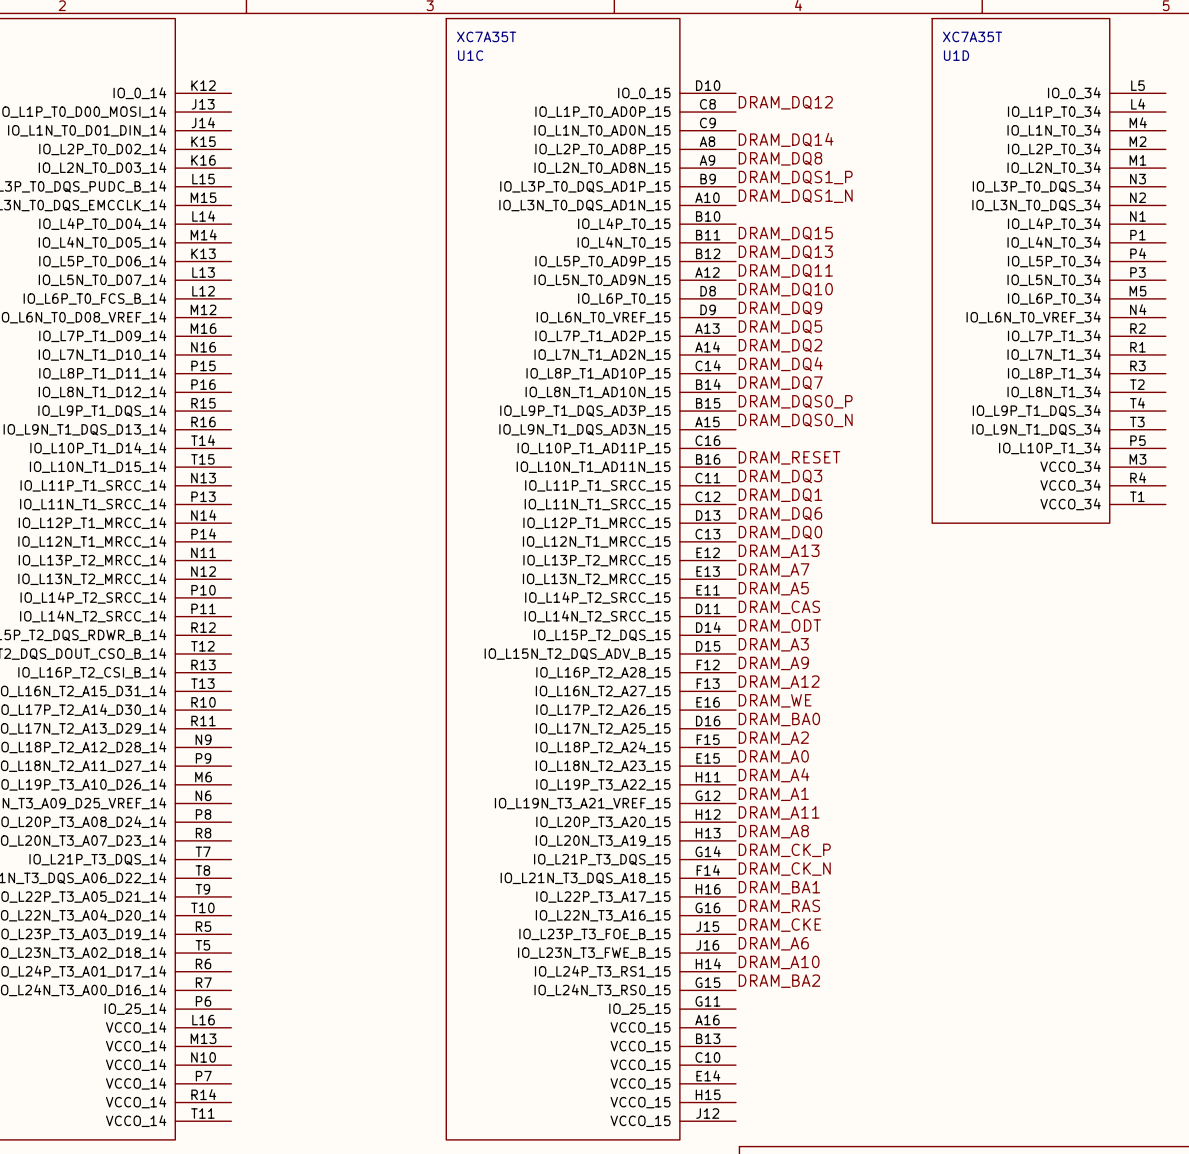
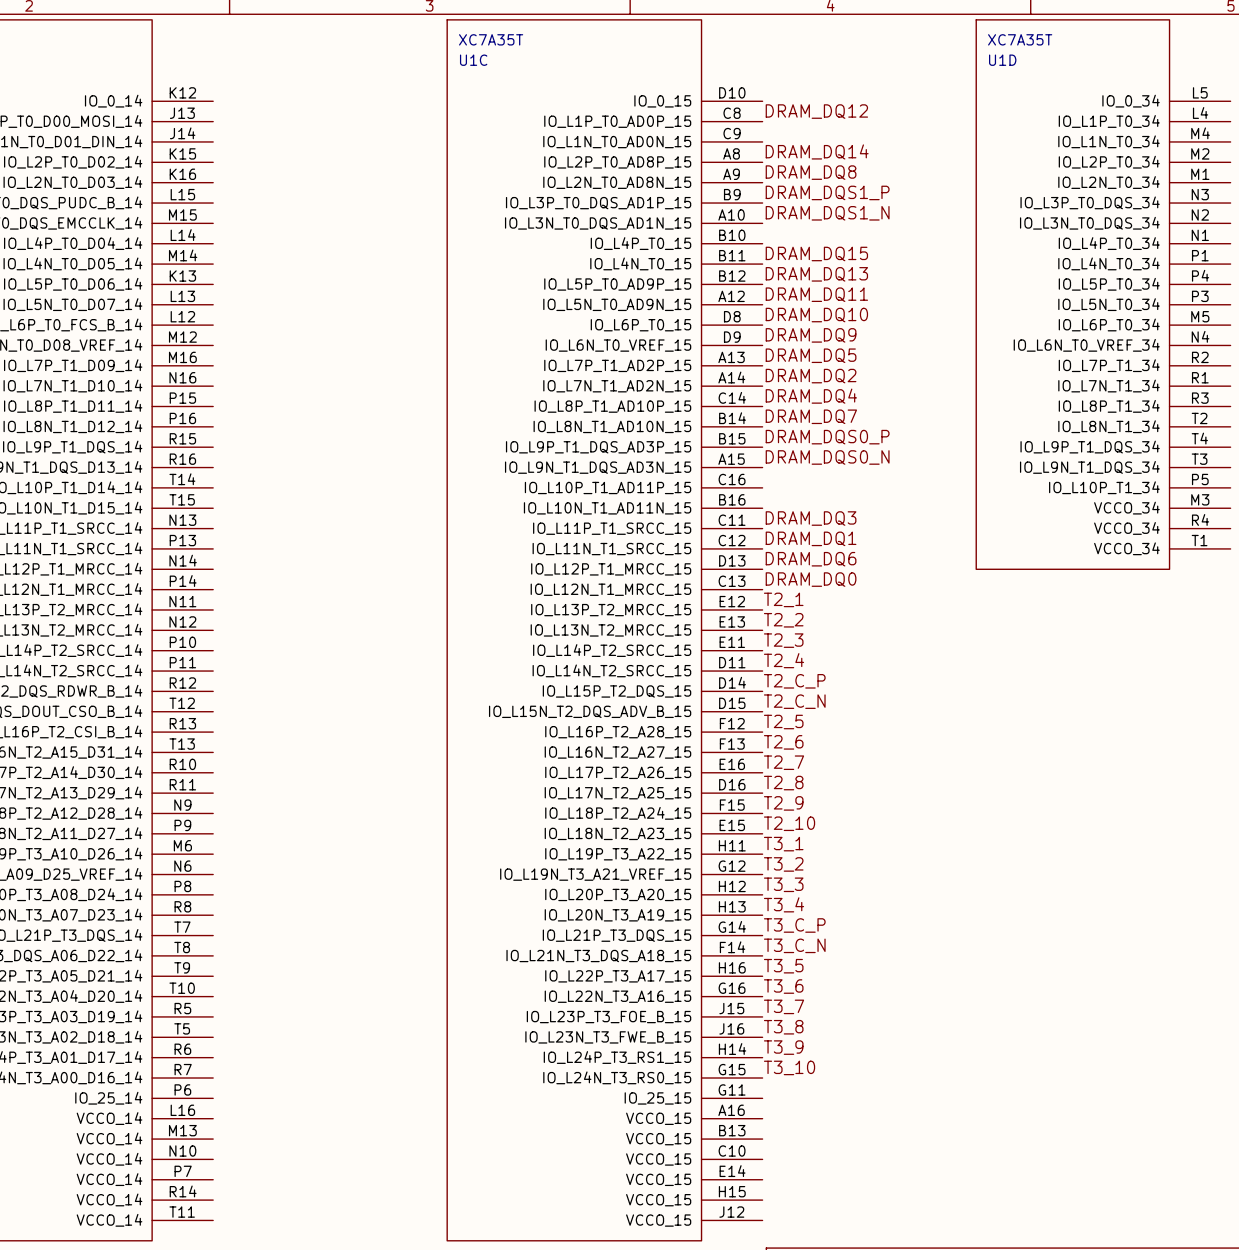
label: DRAM_RESET (789, 457) -> none
label: DRAM_A13 (779, 551) -> T2_1 (783, 599)
label: DRAM_A7 (774, 569) -> T2_2 (783, 620)
label: DRAM_A5 (773, 588) -> T2_3 (783, 640)
label: DRAM_CAS (779, 607) -> T2_4 (784, 660)
label: DRAM_ODT (779, 626) -> T2_C_P (794, 681)
label: DRAM_A3 (773, 644) -> T2_C_N (794, 701)
label: DRAM_A9 (773, 663) -> T2_5 (783, 722)
label: DRAM_A12 (779, 682) -> T2_6 (783, 742)
label: DRAM_WE (775, 700) -> T2_7 (784, 762)
label: DRAM_BA0 (779, 719) -> T2_8 (783, 783)
label: DRAM_A2 (773, 738) -> T2_9 (783, 803)
label: DRAM_A0 (773, 756) -> T2_10 (789, 823)
label: DRAM_A4 (774, 775) -> T3_1 (783, 844)
label: DRAM_A1 (773, 794) -> T3_2 (783, 864)
label: DRAM_A11 (779, 812) -> T3_3 (783, 884)
label: DRAM_A8 (773, 831) -> T3_4 (784, 904)
label: DRAM_CK_P (784, 850) -> T3_C_P (794, 925)
label: DRAM_CK_N (784, 869) -> T3_C_N (794, 945)
label: DRAM_BA1 (779, 887) -> T3_5 (783, 966)
label: DRAM_RAS (779, 906) -> T3_6 (783, 986)
label: DRAM_CKE (779, 925) -> T3_7 (784, 1006)
label: DRAM_A6 (773, 943) -> T3_8 (783, 1027)
label: DRAM_A10 (779, 962) -> T3_9 (783, 1047)
label: DRAM_BA2 (779, 981) -> T3_10 (789, 1067)

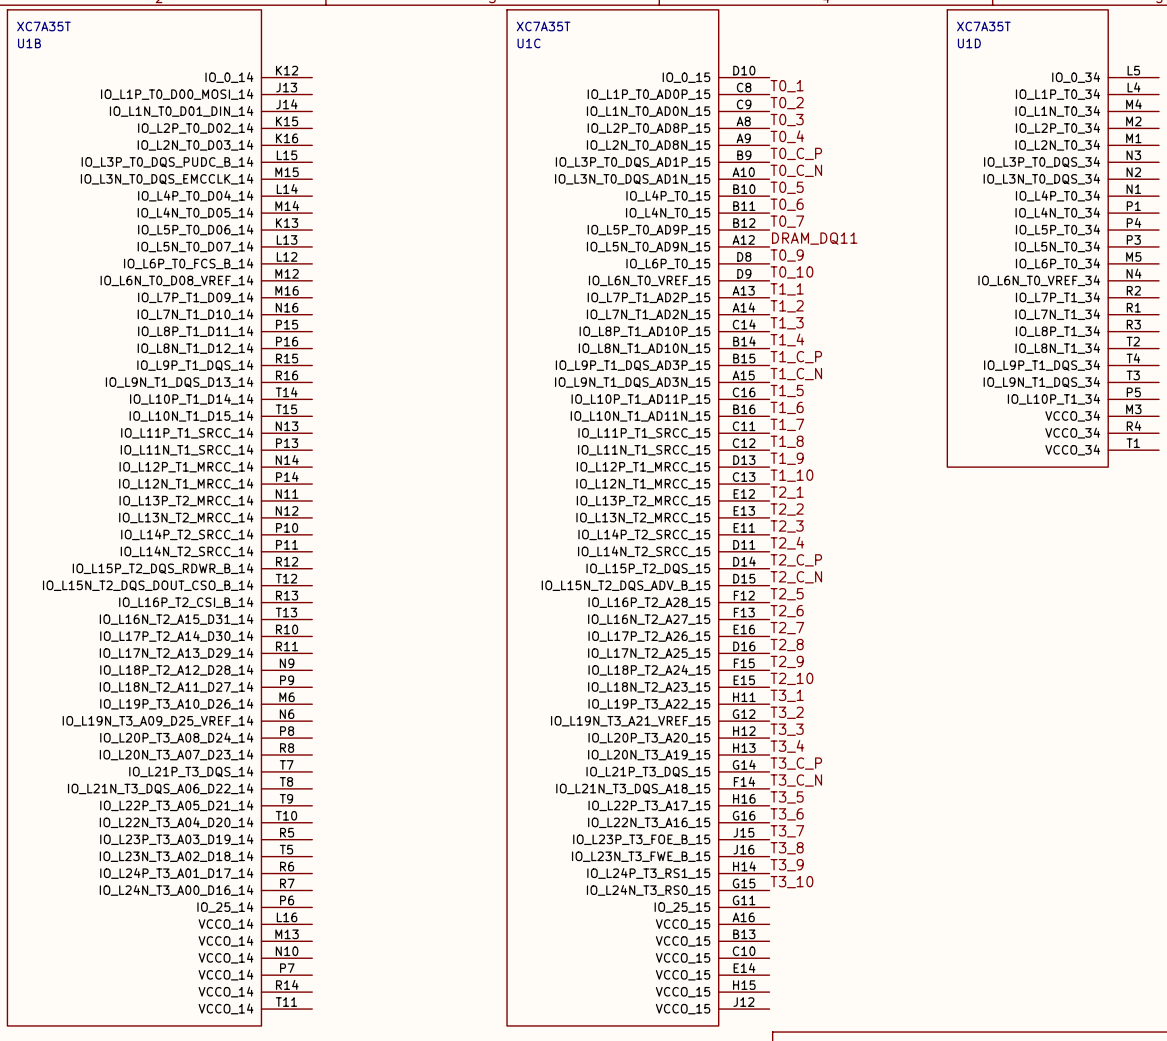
label: DRAM_DQ12 (816, 111) -> T0_1 (787, 86)
label: none -> T0_2 (787, 103)
label: DRAM_DQ14 (817, 151) -> T0_3 (787, 120)
label: DRAM_DQ8 (811, 172) -> T0_4 (787, 136)
label: DRAM_DQS1_P (827, 192) -> T0_C_P (796, 153)
label: DRAM_DQS1_N (827, 213) -> T0_C_N (796, 170)
label: none -> T0_5 (787, 187)
label: DRAM_DQ15 (816, 253) -> T0_6 (787, 204)
label: DRAM_DQ13 (816, 274) -> T0_7 (787, 221)
label: DRAM_DQ10 (816, 315) -> T0_9 (787, 255)
label: DRAM_DQ9 (811, 335) -> T0_10 (791, 272)
label: DRAM_DQ5 (811, 355) -> T1_1 (787, 289)
label: DRAM_DQ2 (811, 376) -> T1_2 (787, 306)
label: DRAM_DQ4 (811, 396) -> T1_3 (787, 323)
label: DRAM_DQ7 (811, 416) -> T1_4 (787, 339)
label: DRAM_DQS0_P (827, 437) -> T1_C_P (796, 357)
label: DRAM_DQS0_N (827, 457) -> T1_C_N (796, 374)
label: none -> T1_5 (787, 390)
label: none -> T1_6 (787, 407)
label: DRAM_DQ3 (811, 518) -> T1_7 (787, 424)
label: DRAM_DQ1 (811, 538) -> T1_8 (787, 441)
label: DRAM_DQ6 (811, 559) -> T1_9 (787, 458)
label: DRAM_DQ0 (811, 579) -> T1_10 (791, 475)

